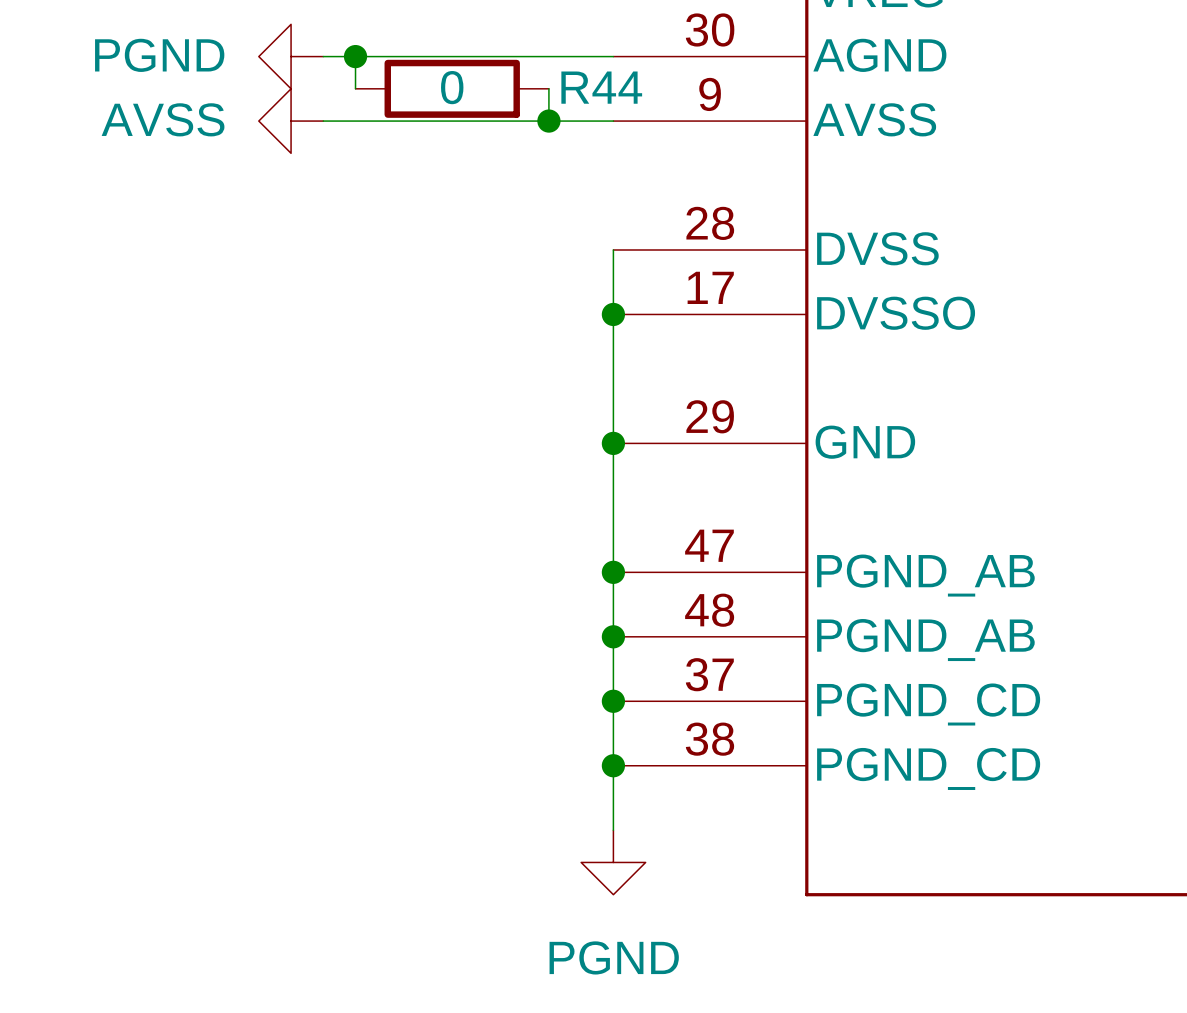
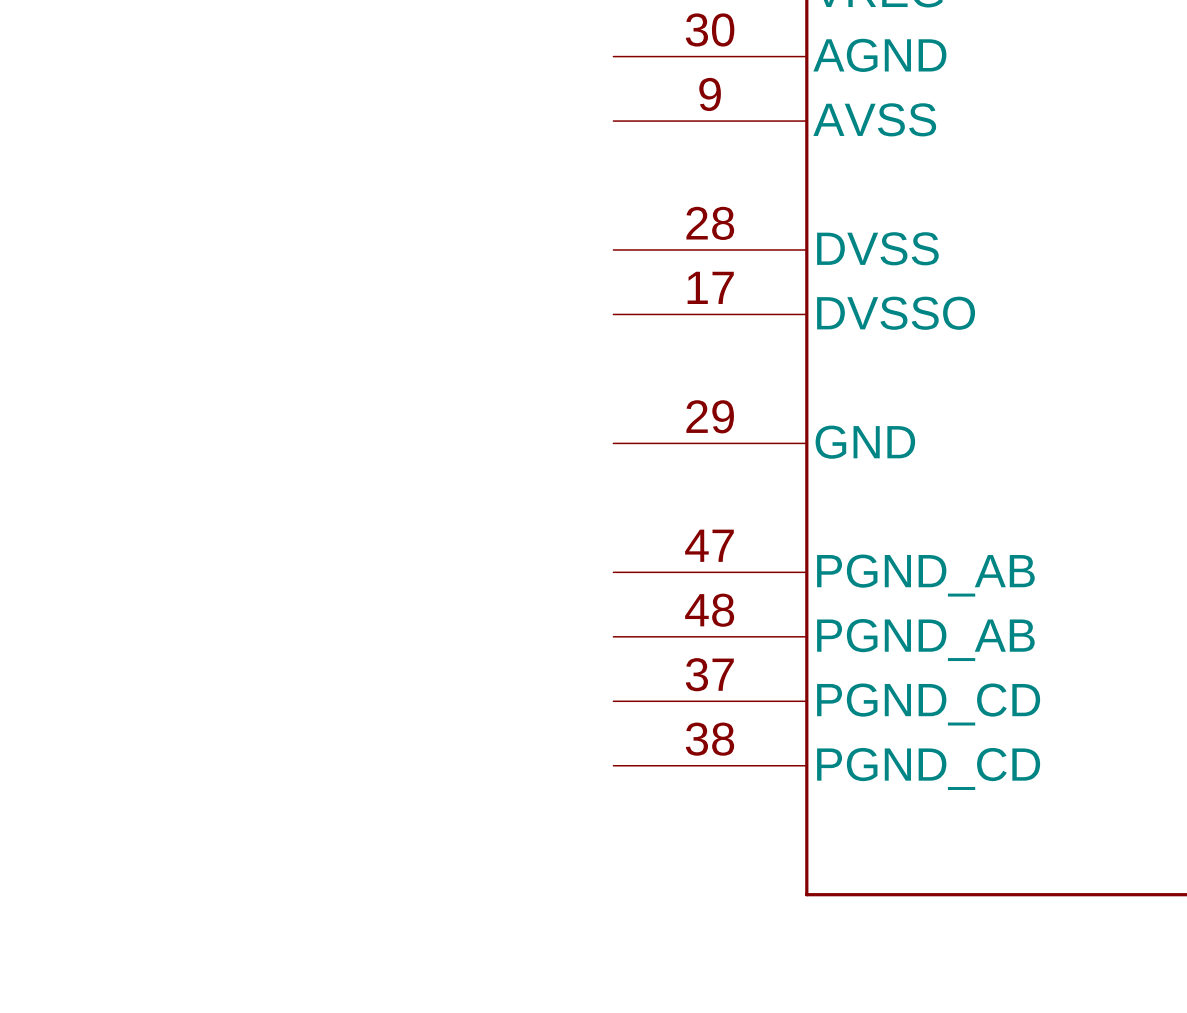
power symbol: PGND (291, 56) -> none
wire: (323, 56) (613, 56) -> none
wire: (355, 56) (355, 88) -> none
junction: (355, 56) -> none
R44: 0 (452, 88) -> none
wire: (548, 88) (548, 121) -> none
power symbol: AVSS (291, 121) -> none
wire: (323, 121) (613, 121) -> none
junction: (548, 121) -> none
wire: (613, 249) (613, 830) -> none
junction: (613, 314) -> none
junction: (613, 443) -> none
junction: (613, 572) -> none
junction: (613, 636) -> none
junction: (613, 701) -> none
junction: (613, 765) -> none
power symbol: PGND (613, 862) -> none

